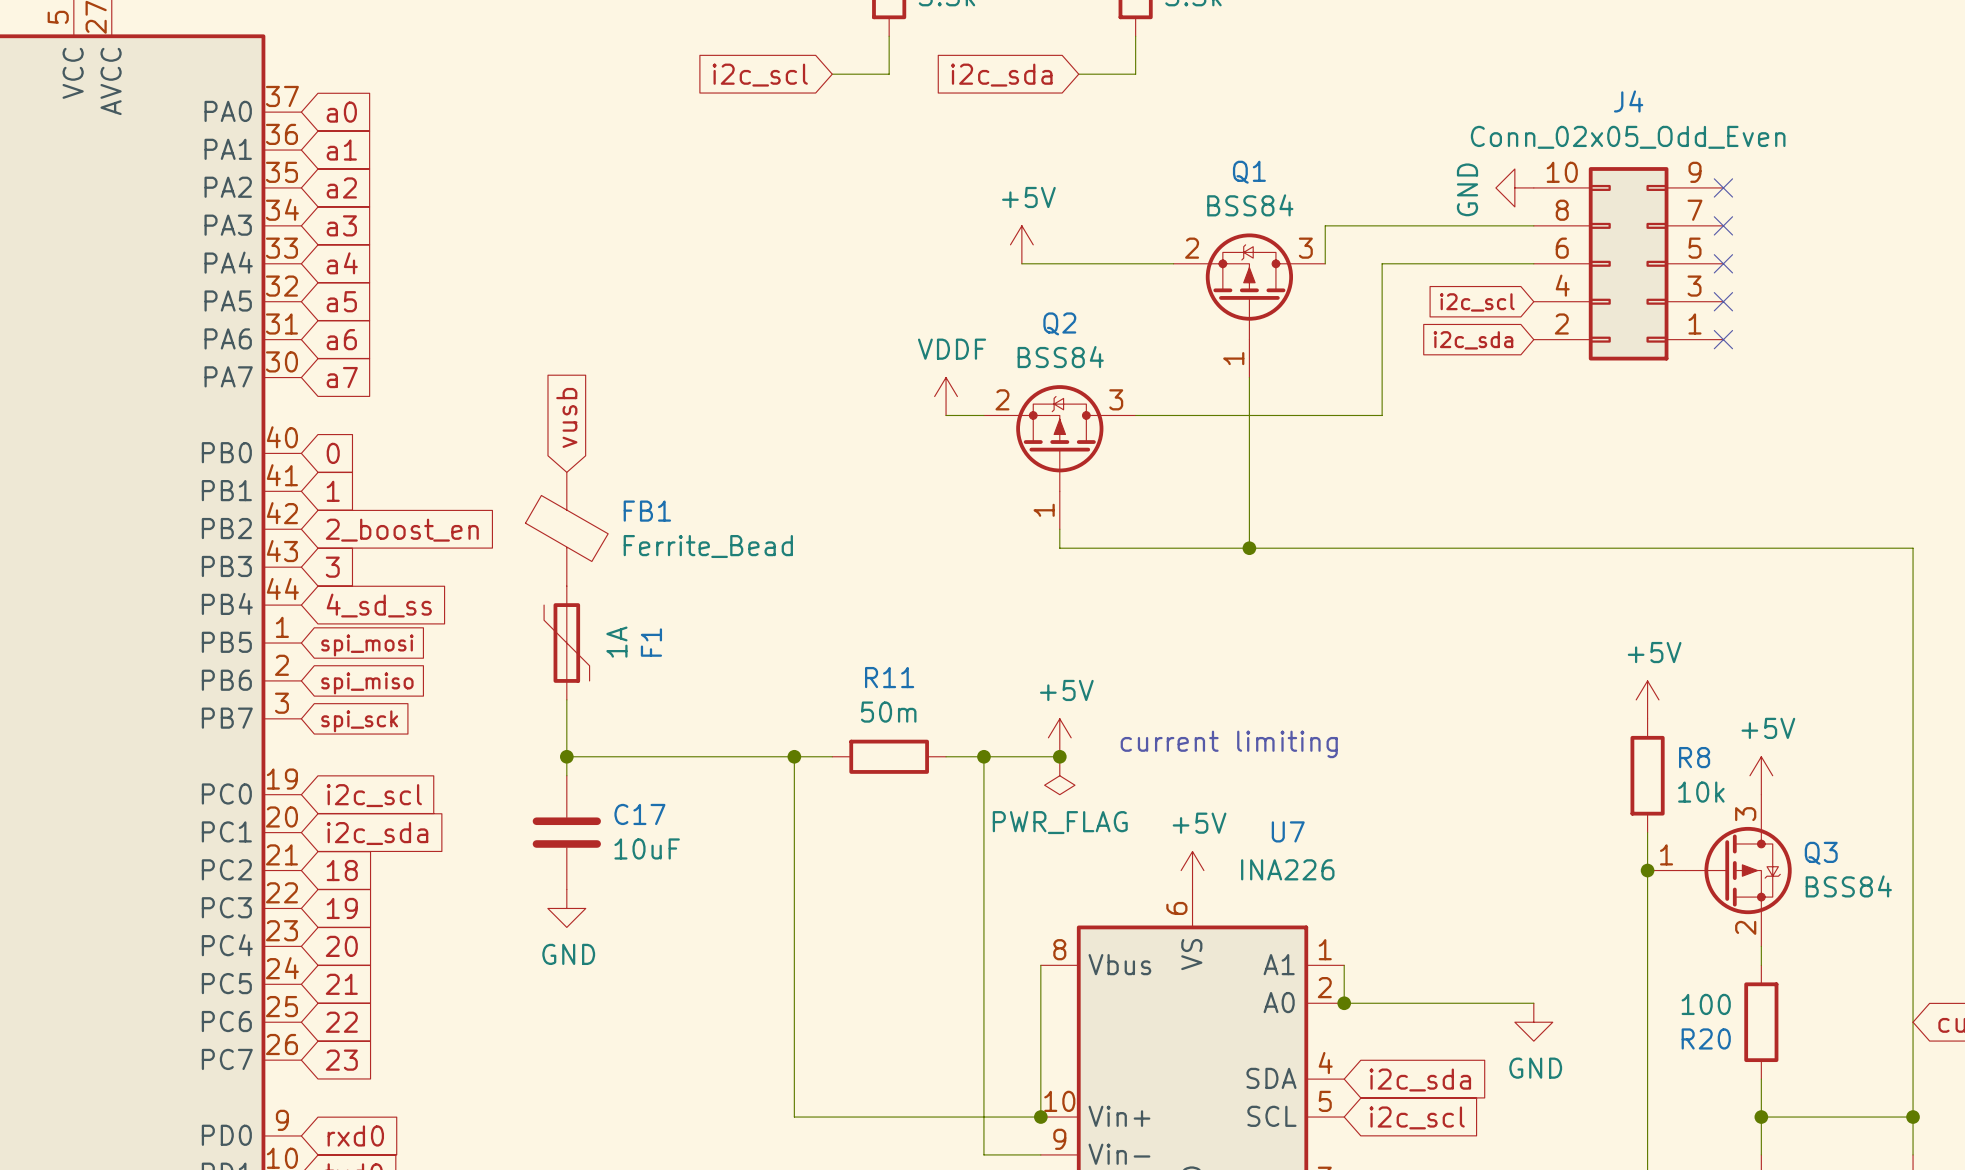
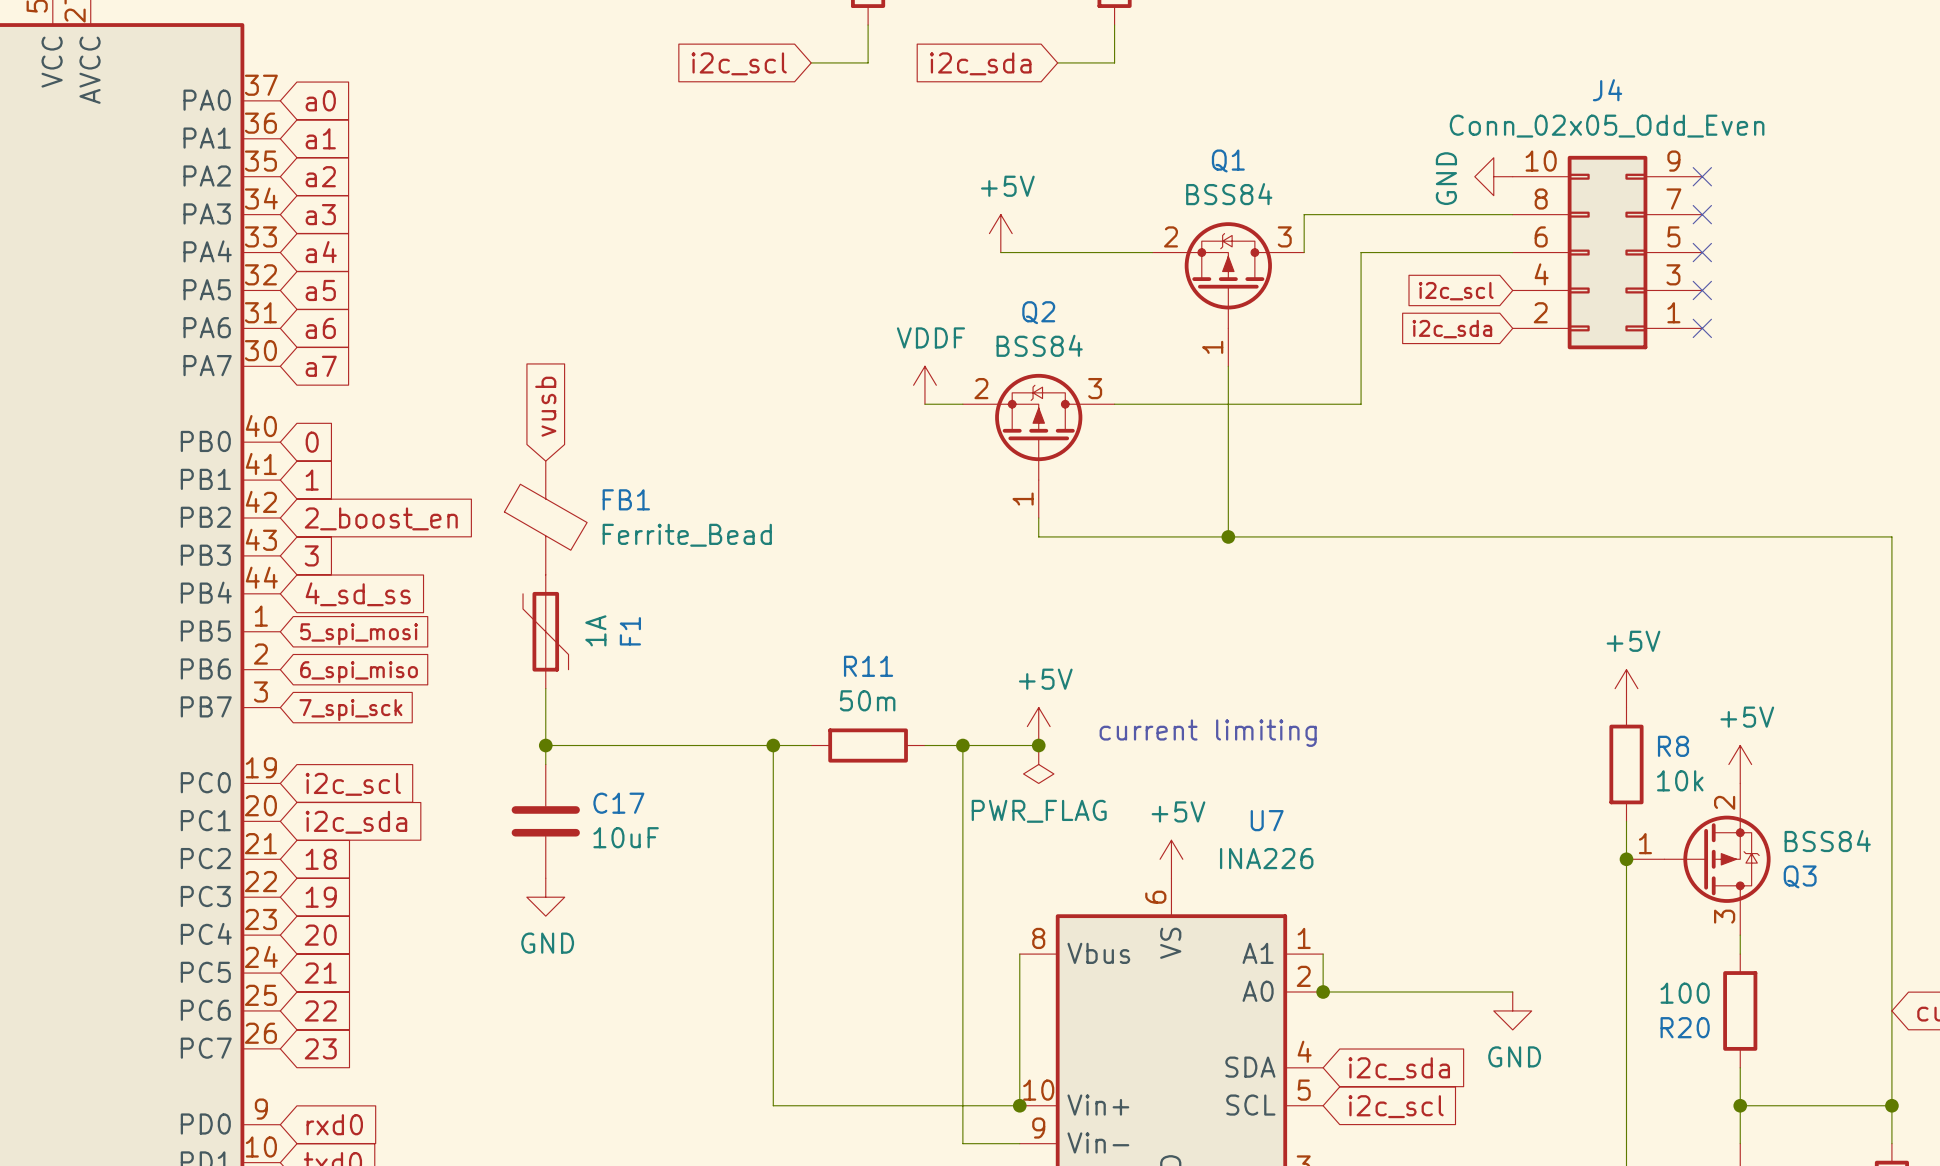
global label: spi_mosi (367, 645) -> 5_spi_mosi (359, 634)
global label: spi_miso (367, 683) -> 6_spi_miso (359, 672)
global label: spi_sck (359, 721) -> 7_spi_sck (350, 710)
Q3 flip: as is (1738, 870) -> up-down (1717, 859)

